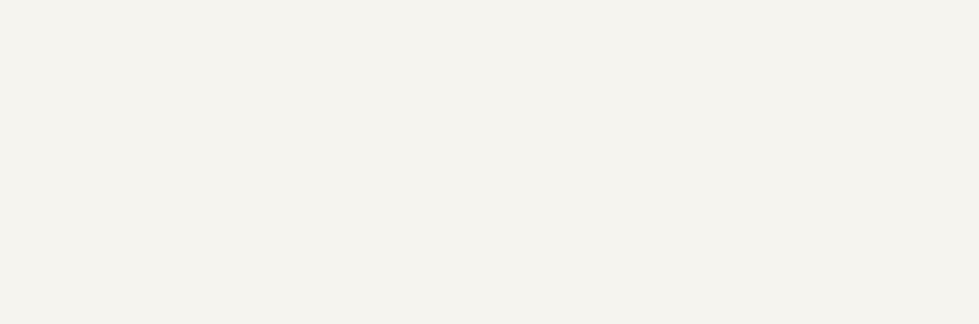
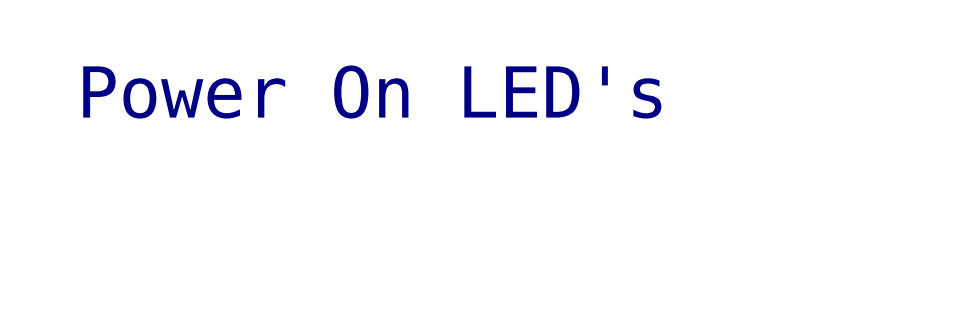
text: none -> Power On LED's (372, 92)

